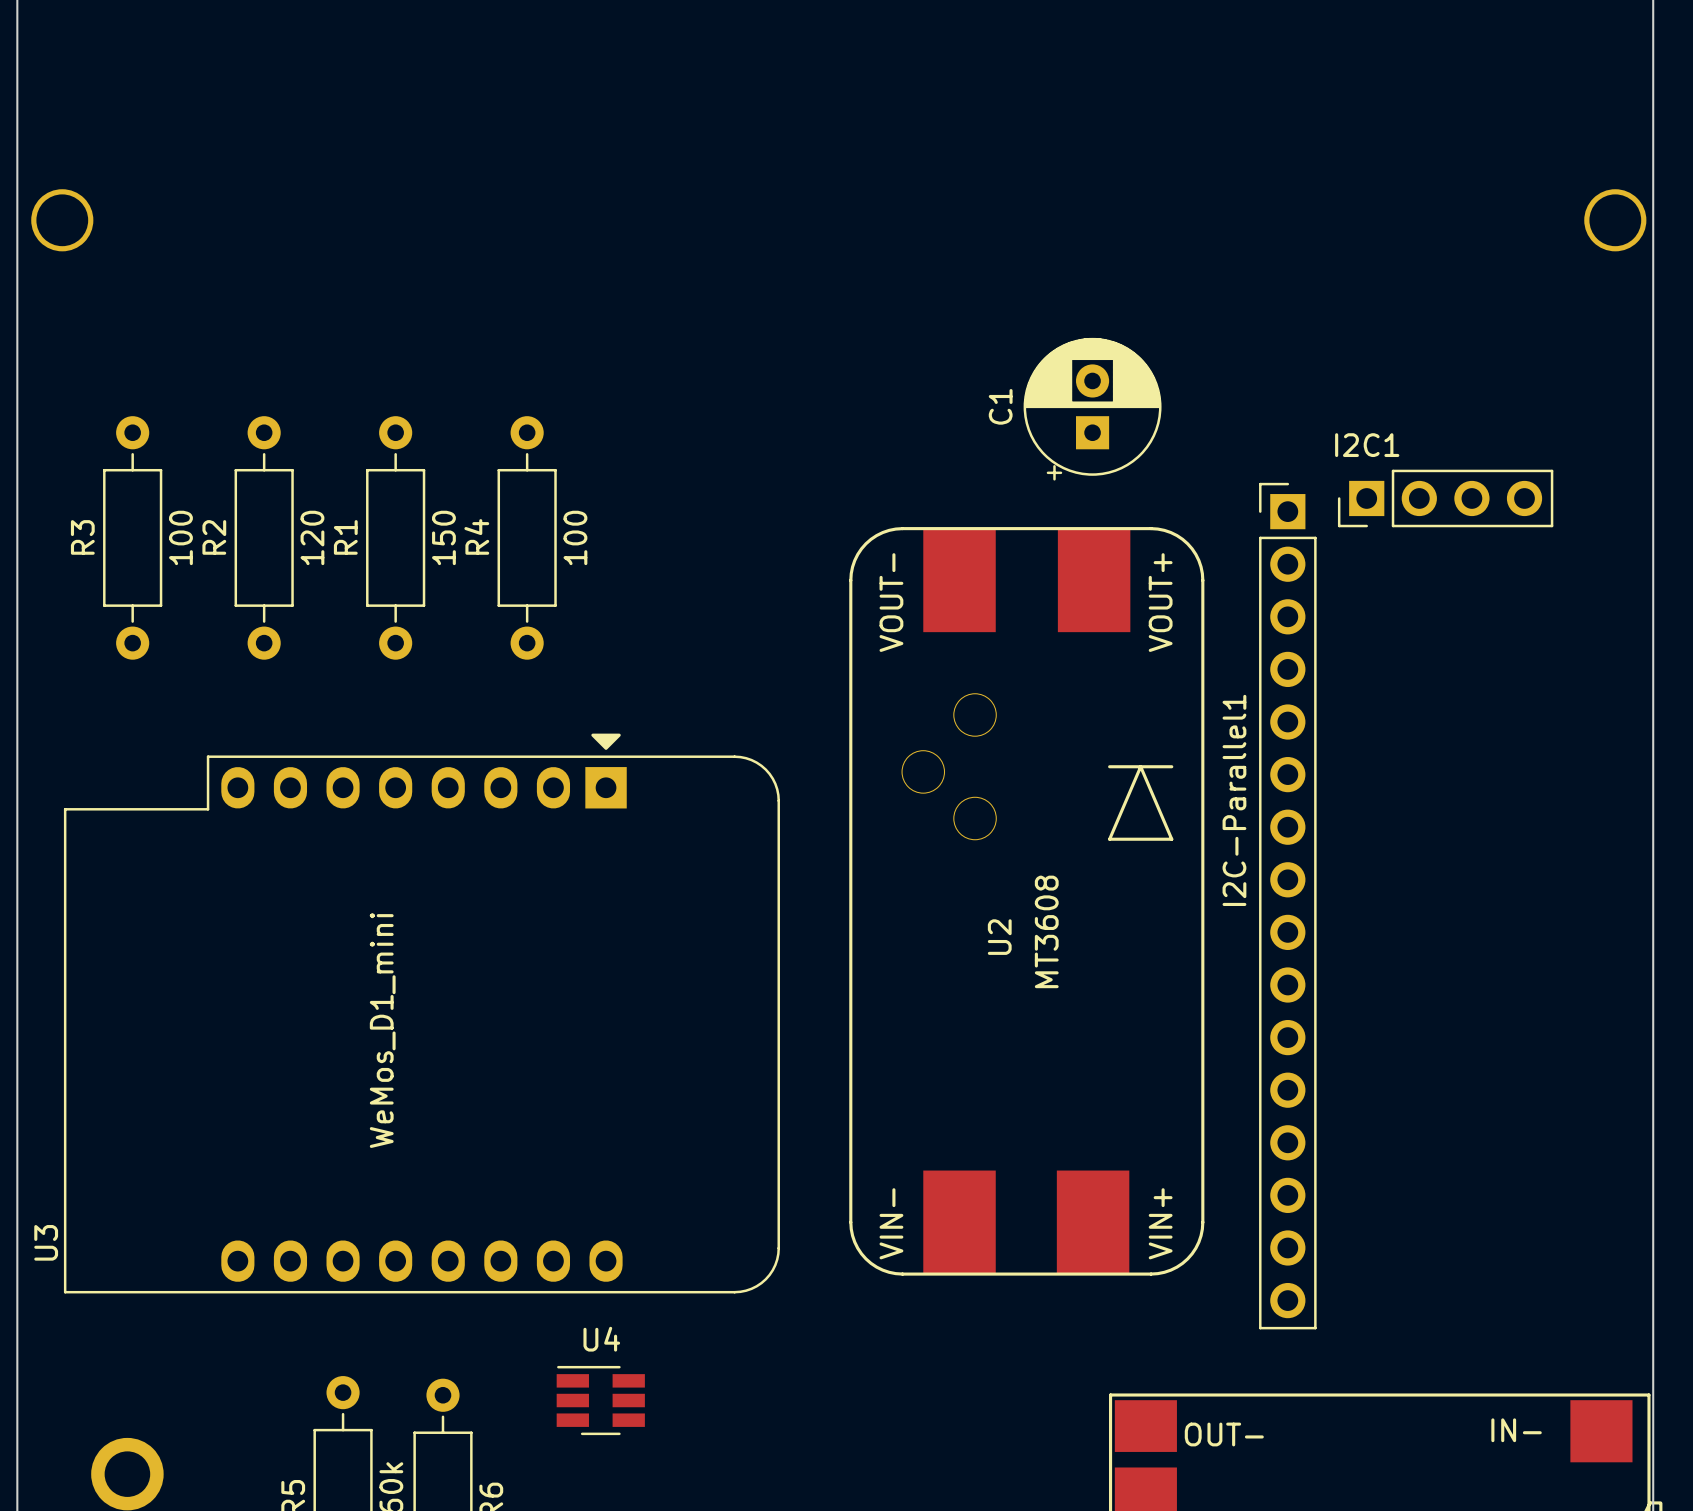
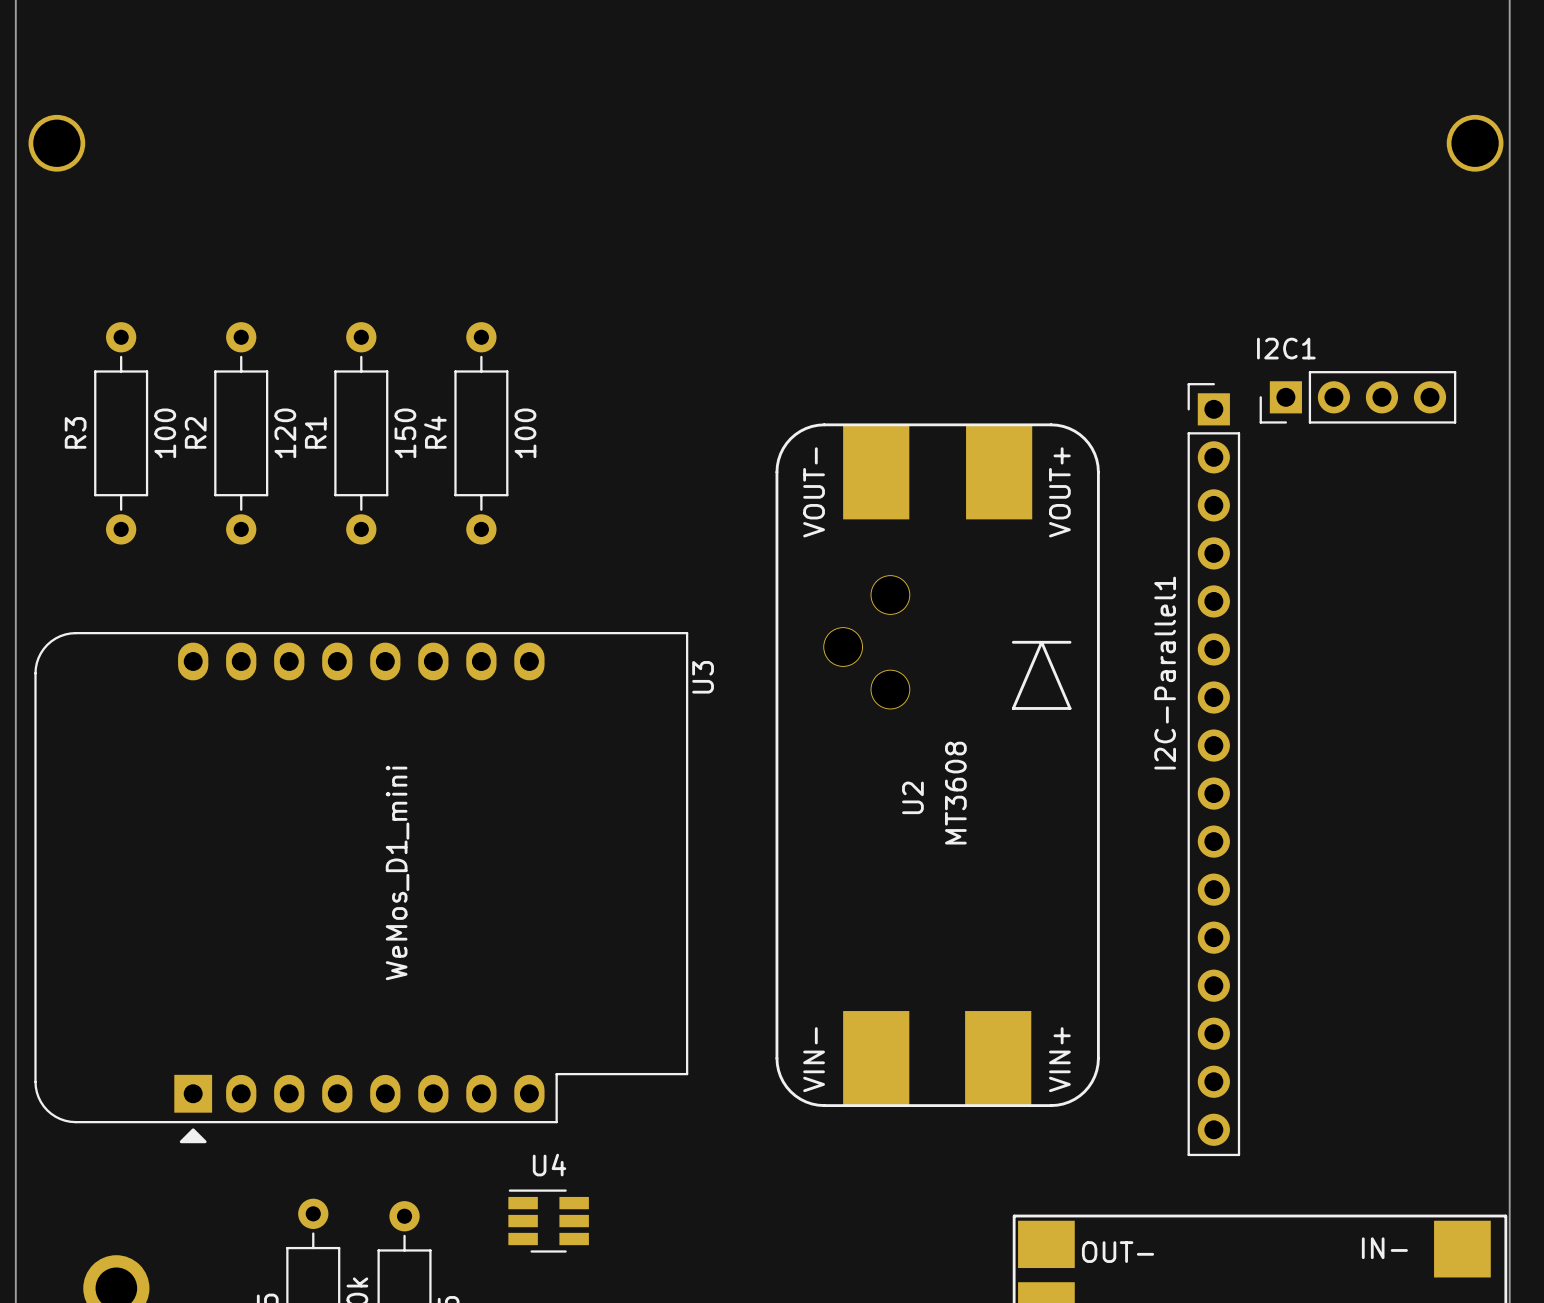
C1: (1092, 409) -> none
I2C1 position: (1445, 498) -> (1357, 397)
I2C-Parallel1 position: (1287, 906) -> (1213, 769)
U3 rotation: 0° (421, 1013) -> 180° (361, 887)

